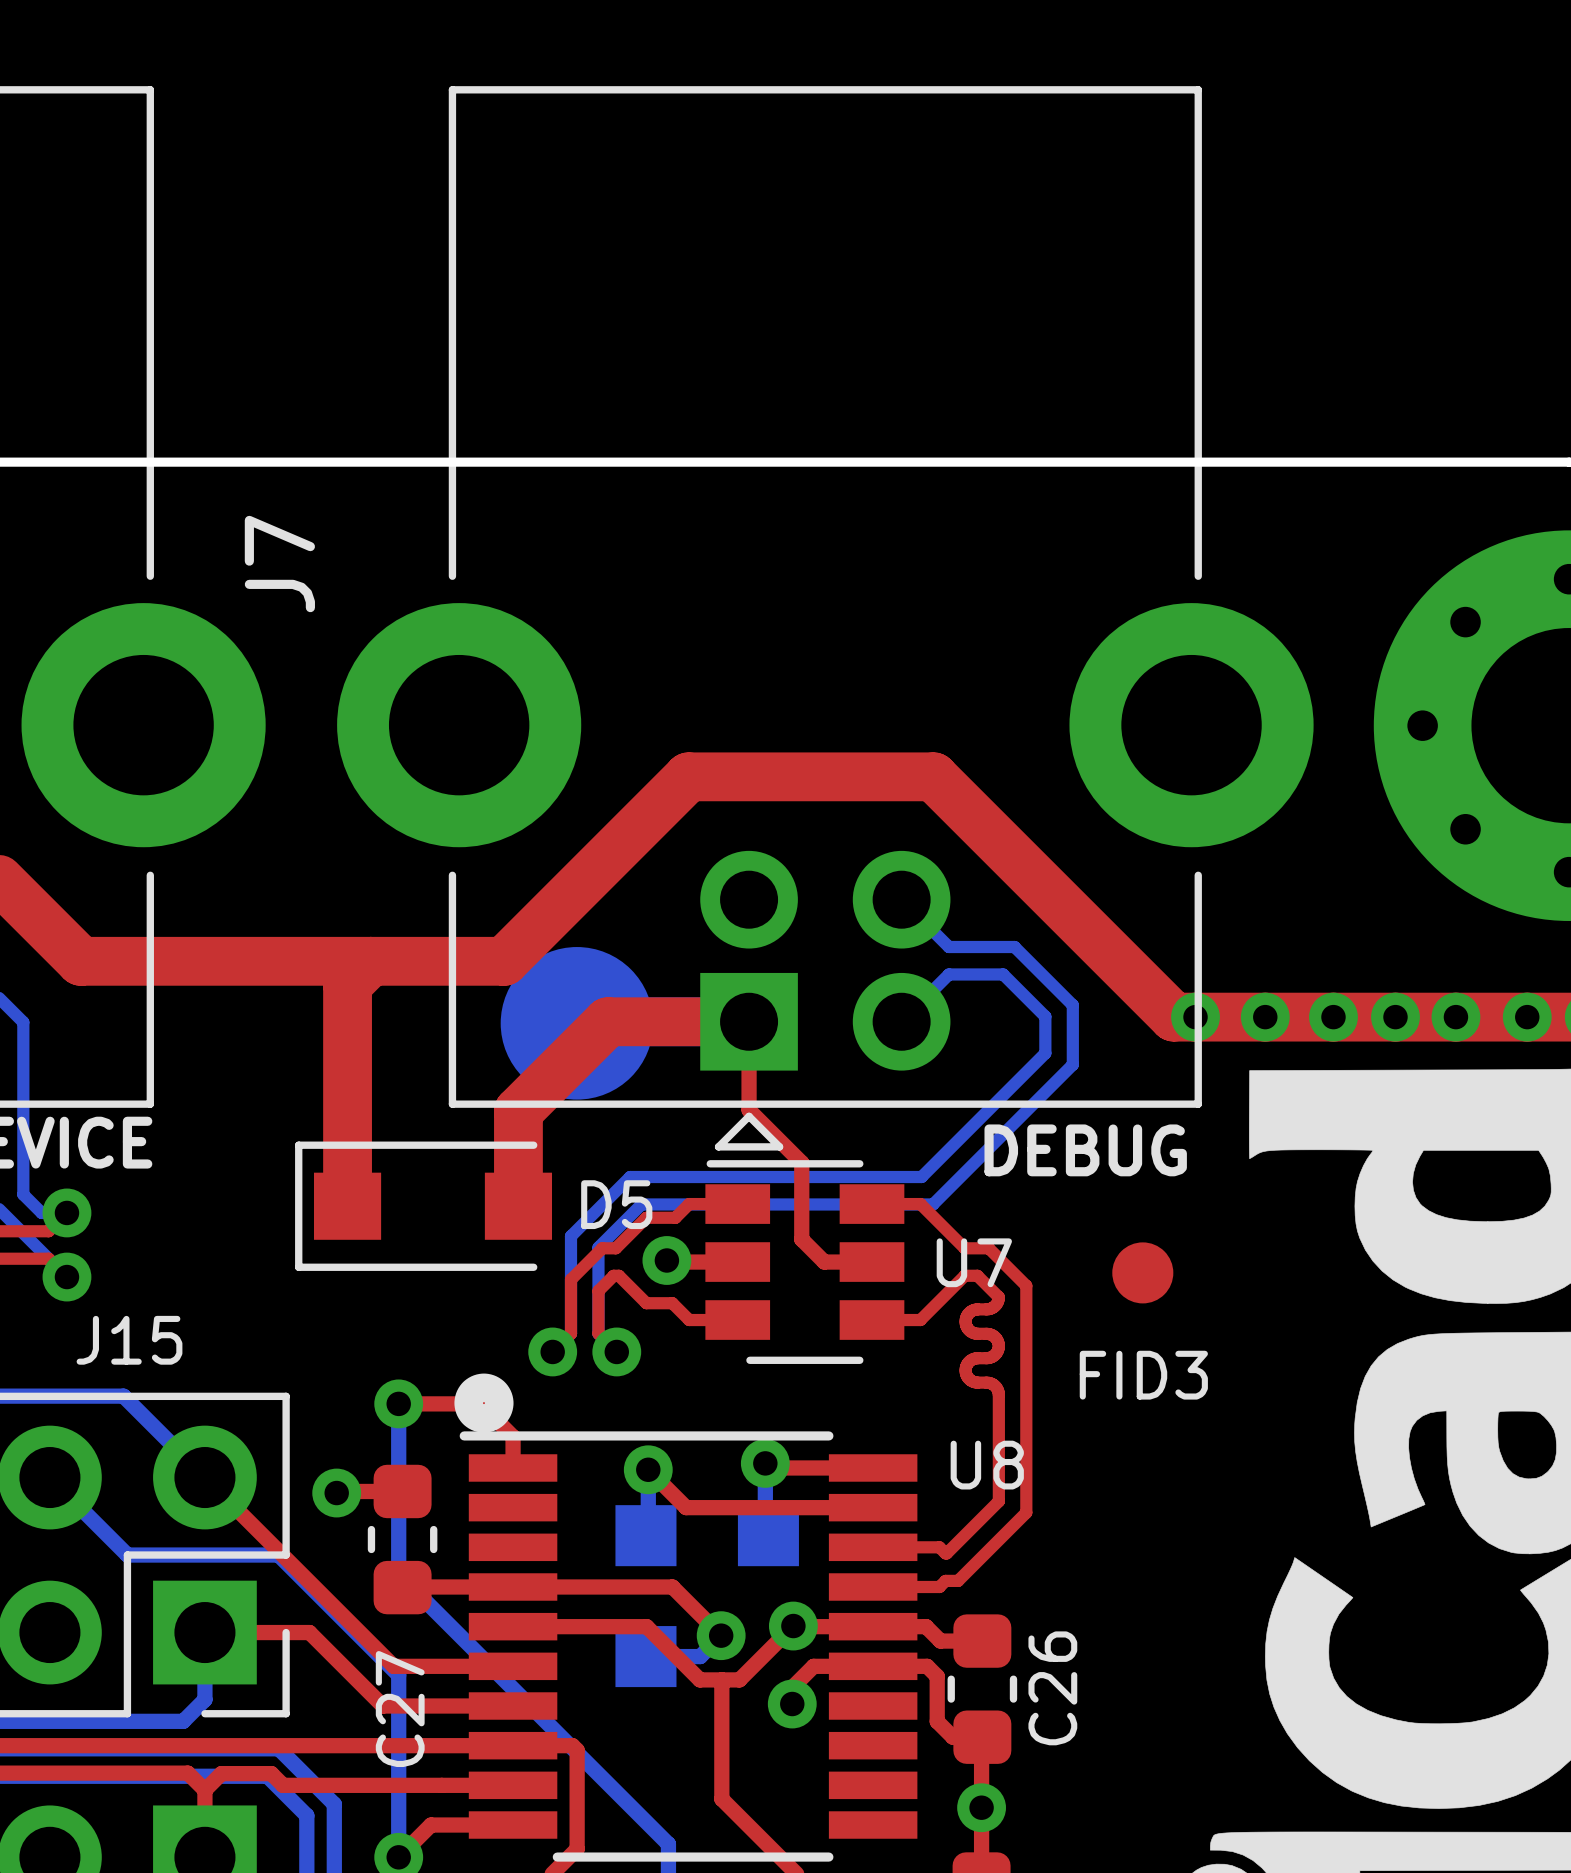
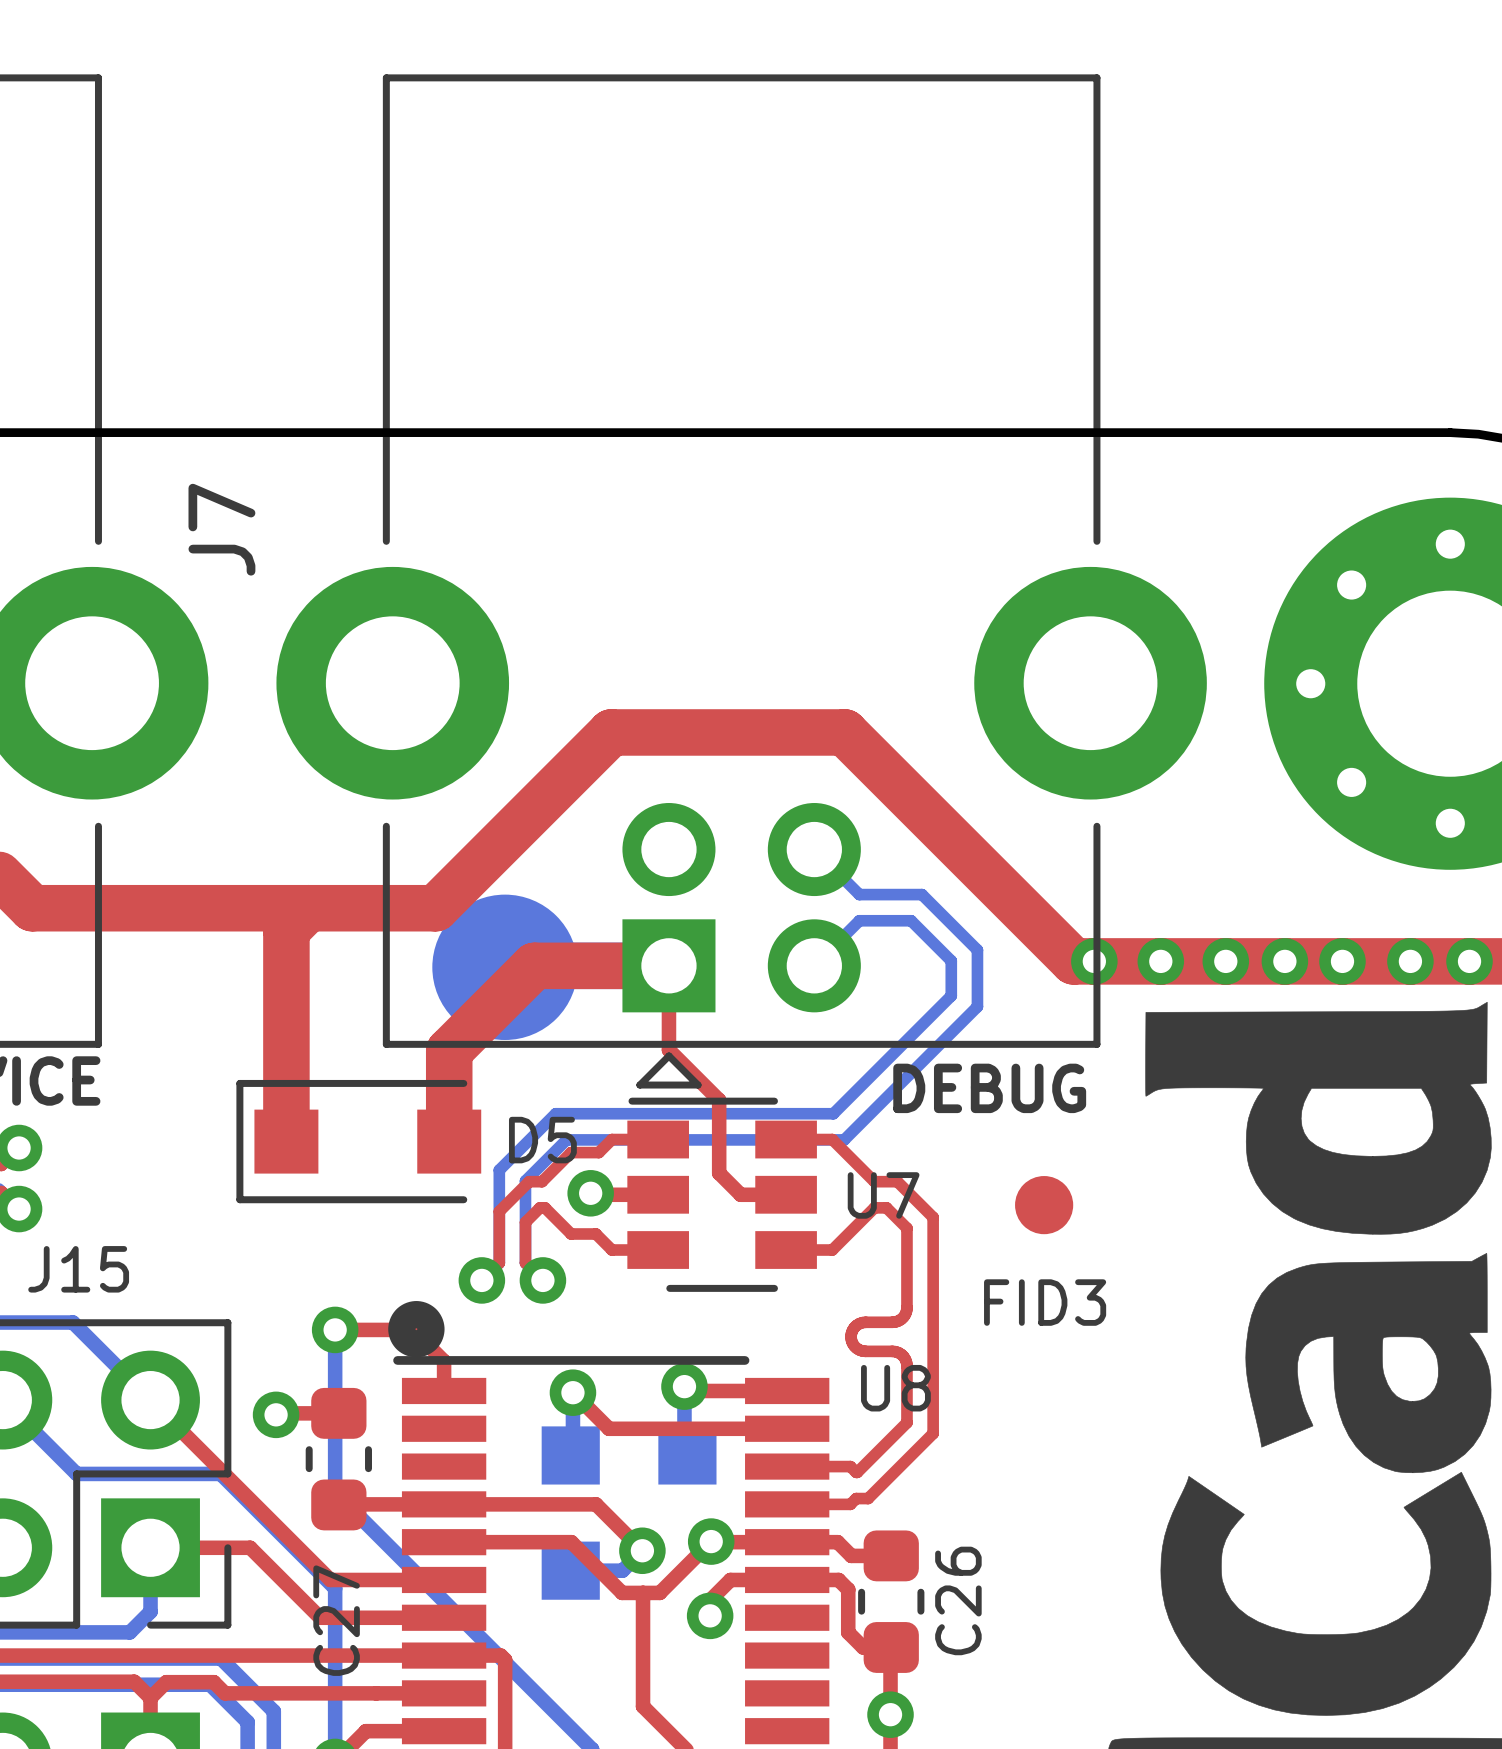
top track: (998, 1297) (996, 1304) (991, 1308) (970, 1312) (965, 1321) (970, 1331) (991, 1335) (998, 1343) (998, 1348) (994, 1355) (972, 1359) (968, 1362) (965, 1370) (968, 1378) (972, 1381) (989, 1382) (997, 1389) (998, 1441) -> (906, 1228) (905, 1314) (895, 1321) (859, 1323) (852, 1330) (851, 1336) (854, 1345) (862, 1350) (898, 1352) (905, 1359) (906, 1365)

